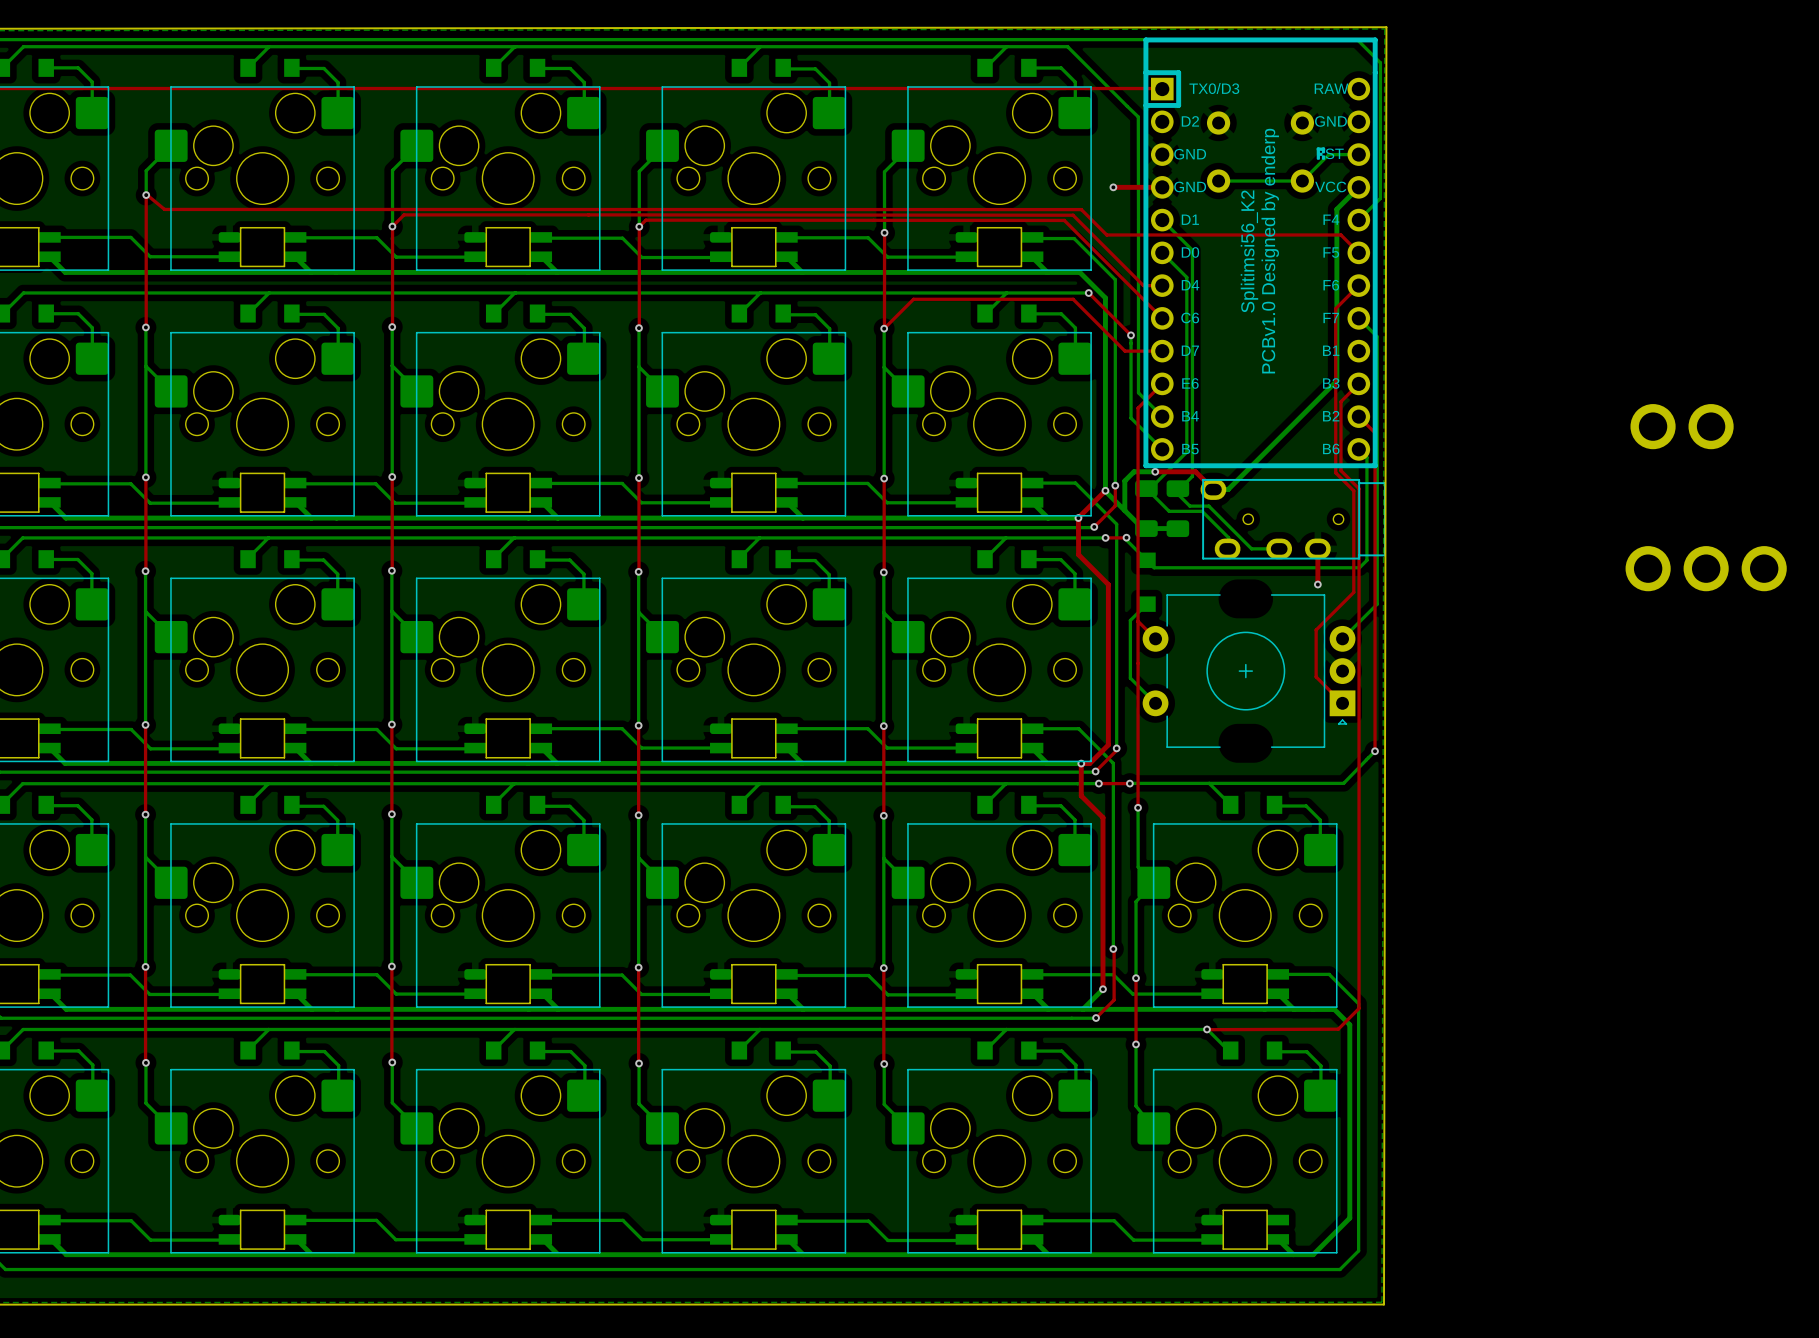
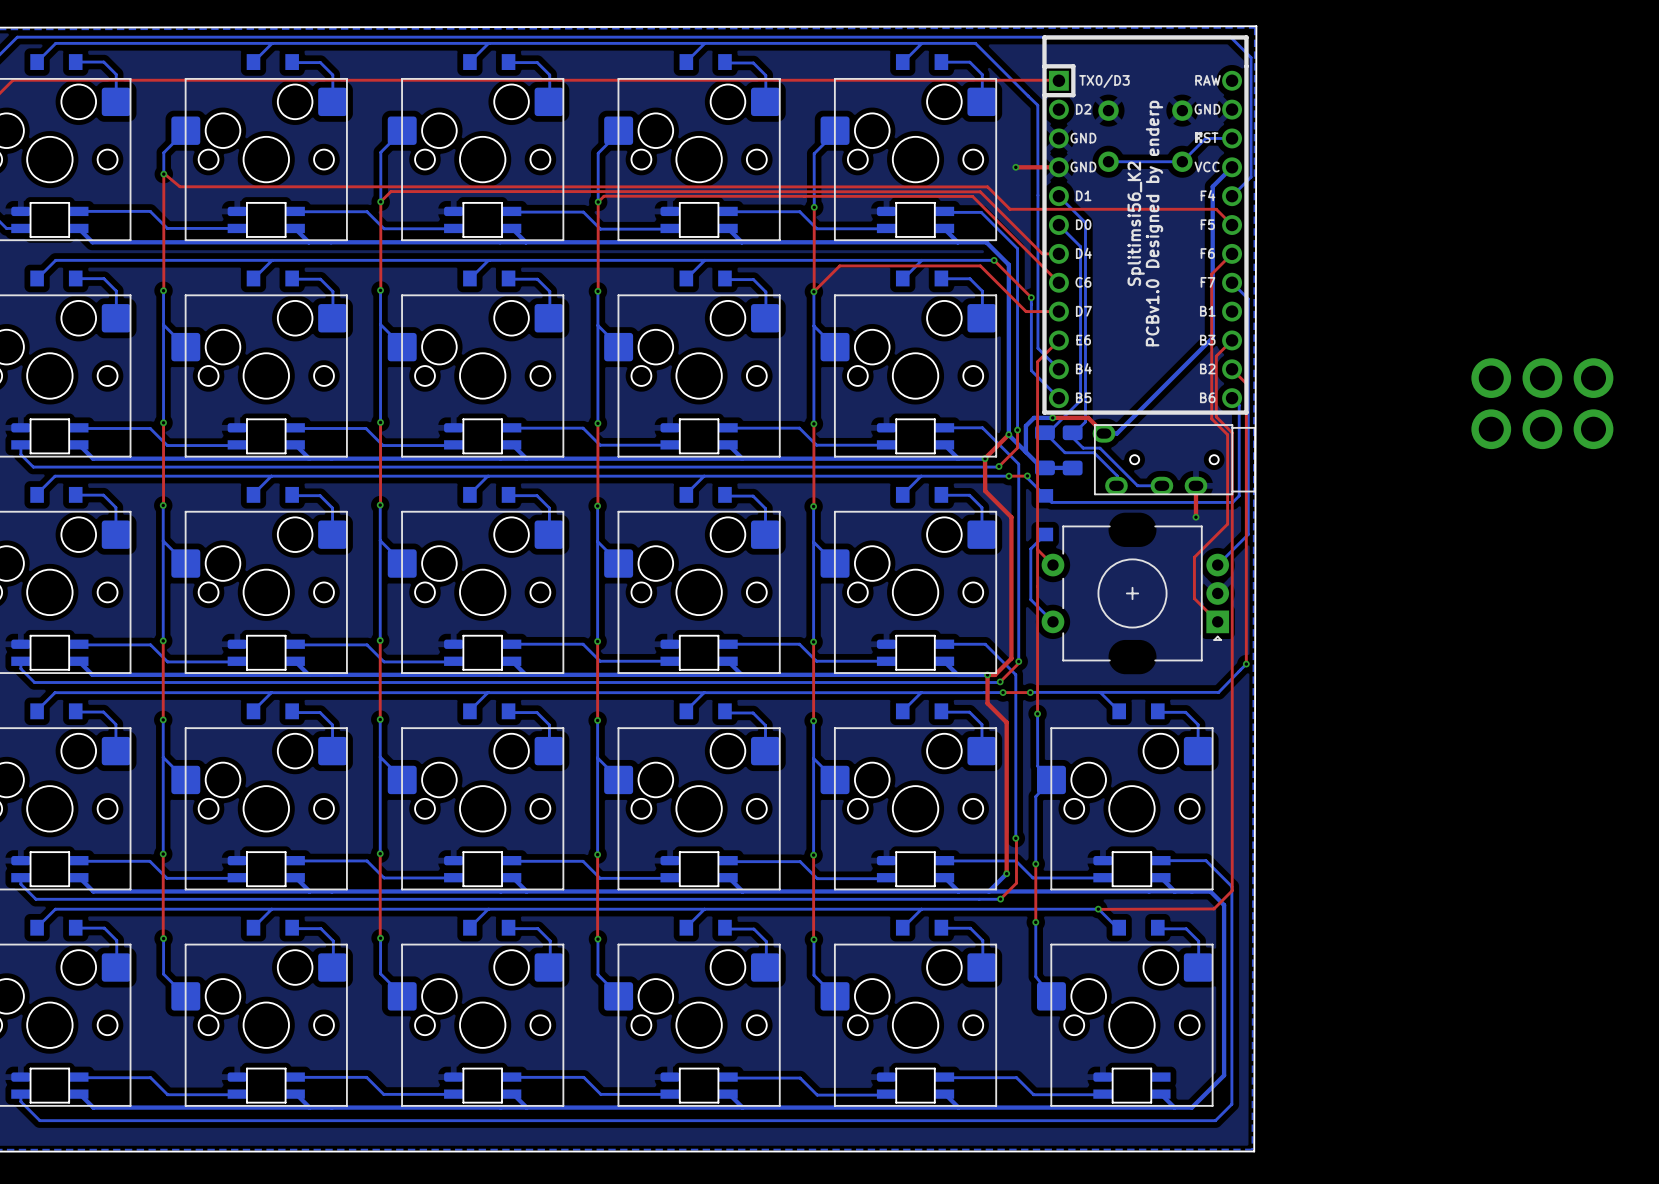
part: none -> (1593, 378)
part: none -> (1491, 429)
part: none -> (1542, 429)
part: none -> (1593, 429)
part: (1648, 568) -> none
part: (1706, 568) -> none
part: (1764, 568) -> none

